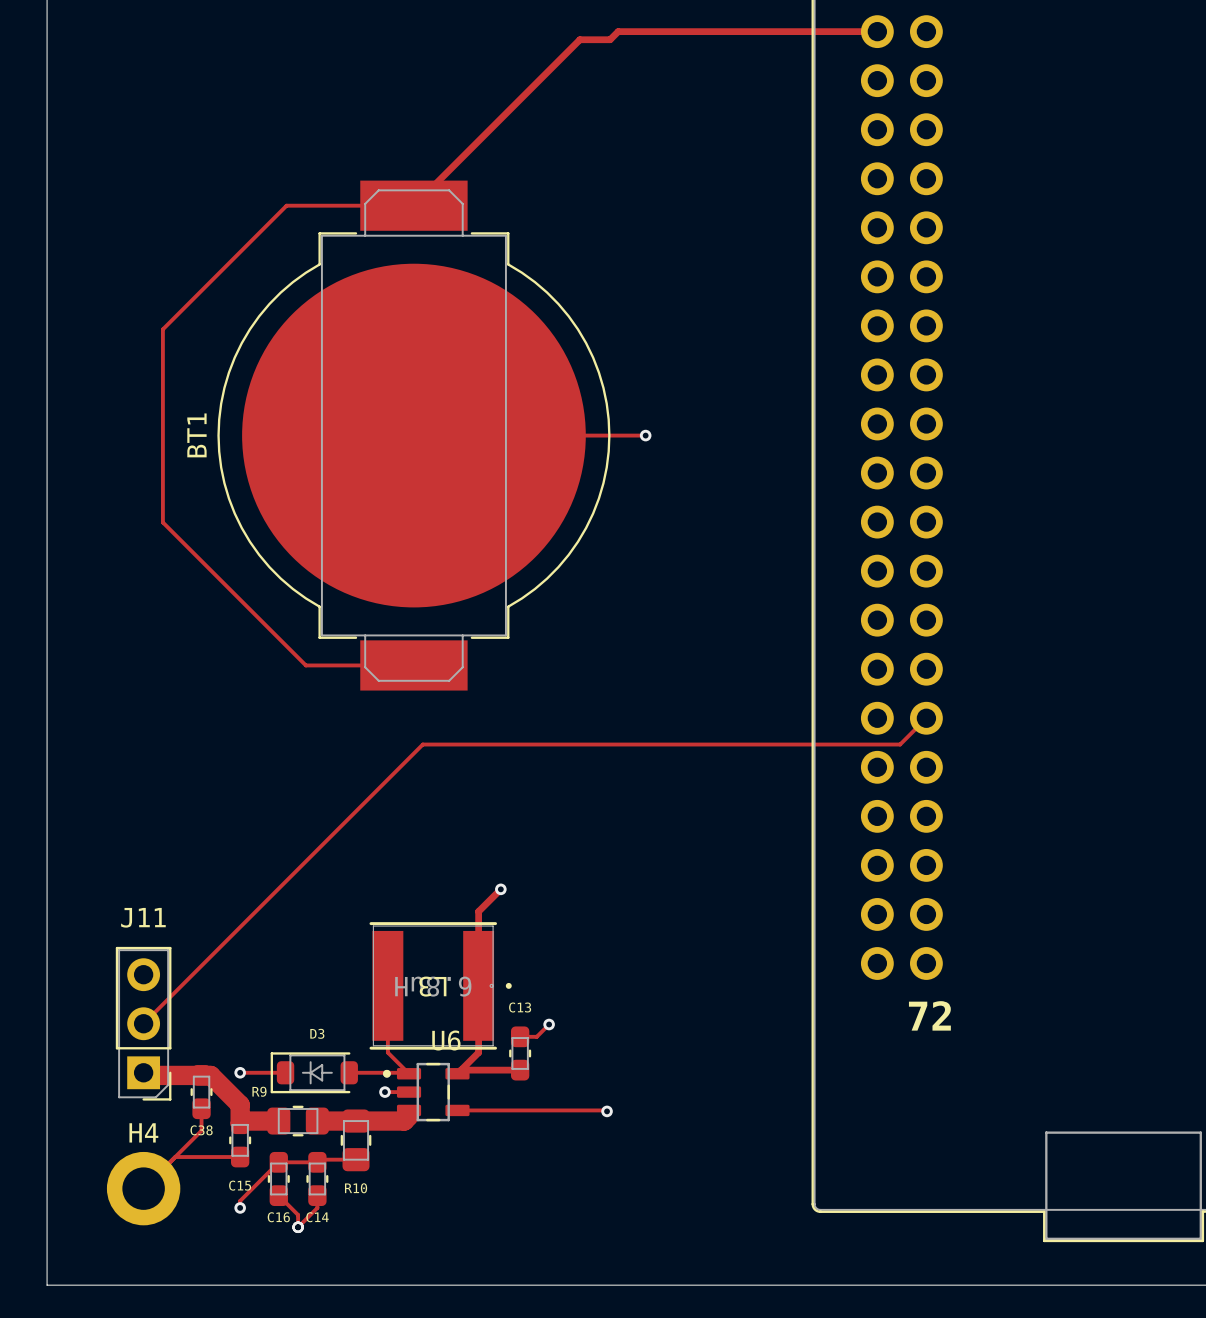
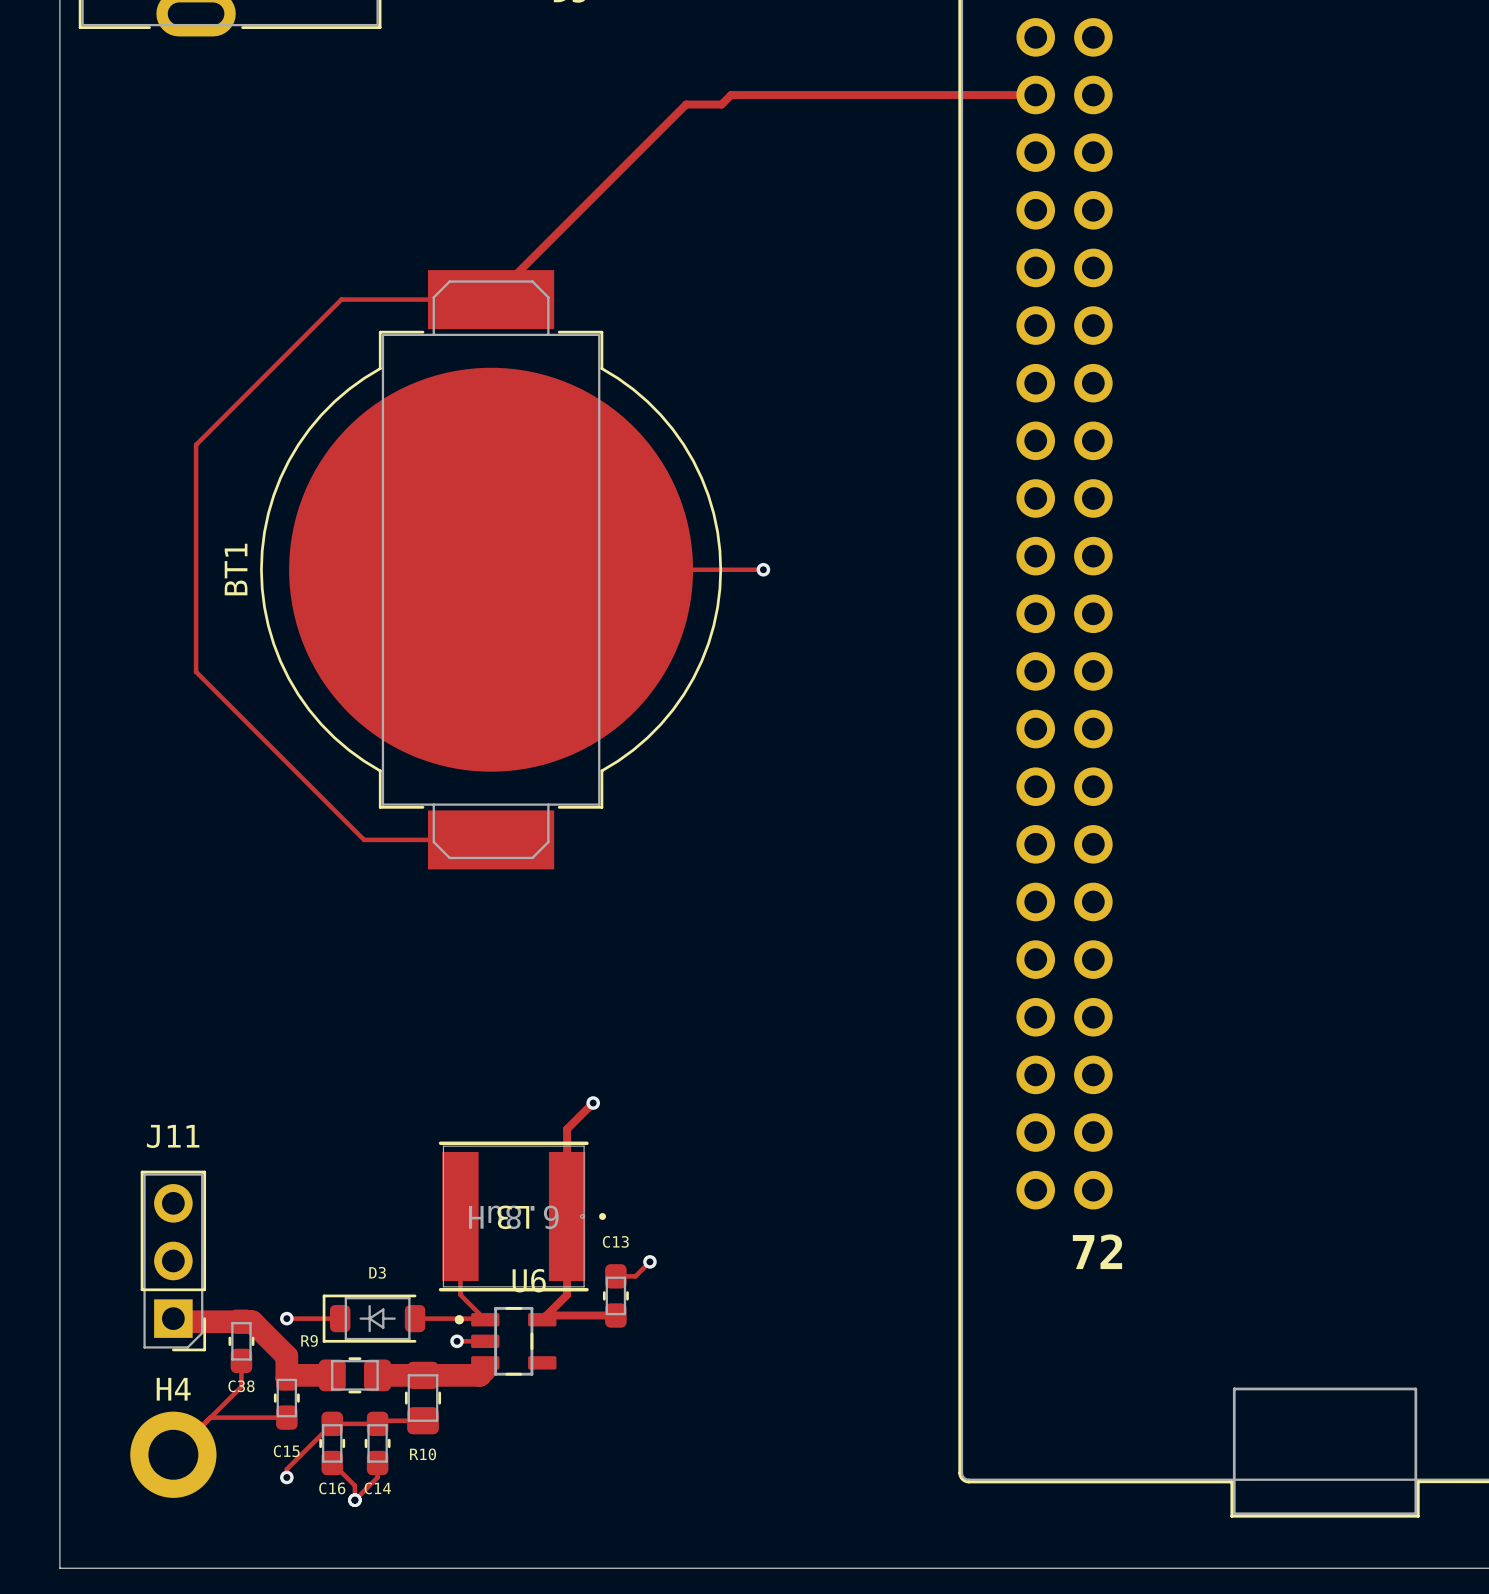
track: (926, 718) (900, 744) (422, 744) (143, 1023) -> none
track: (457, 1110) (607, 1111) -> none
via: (607, 1111) -> none

